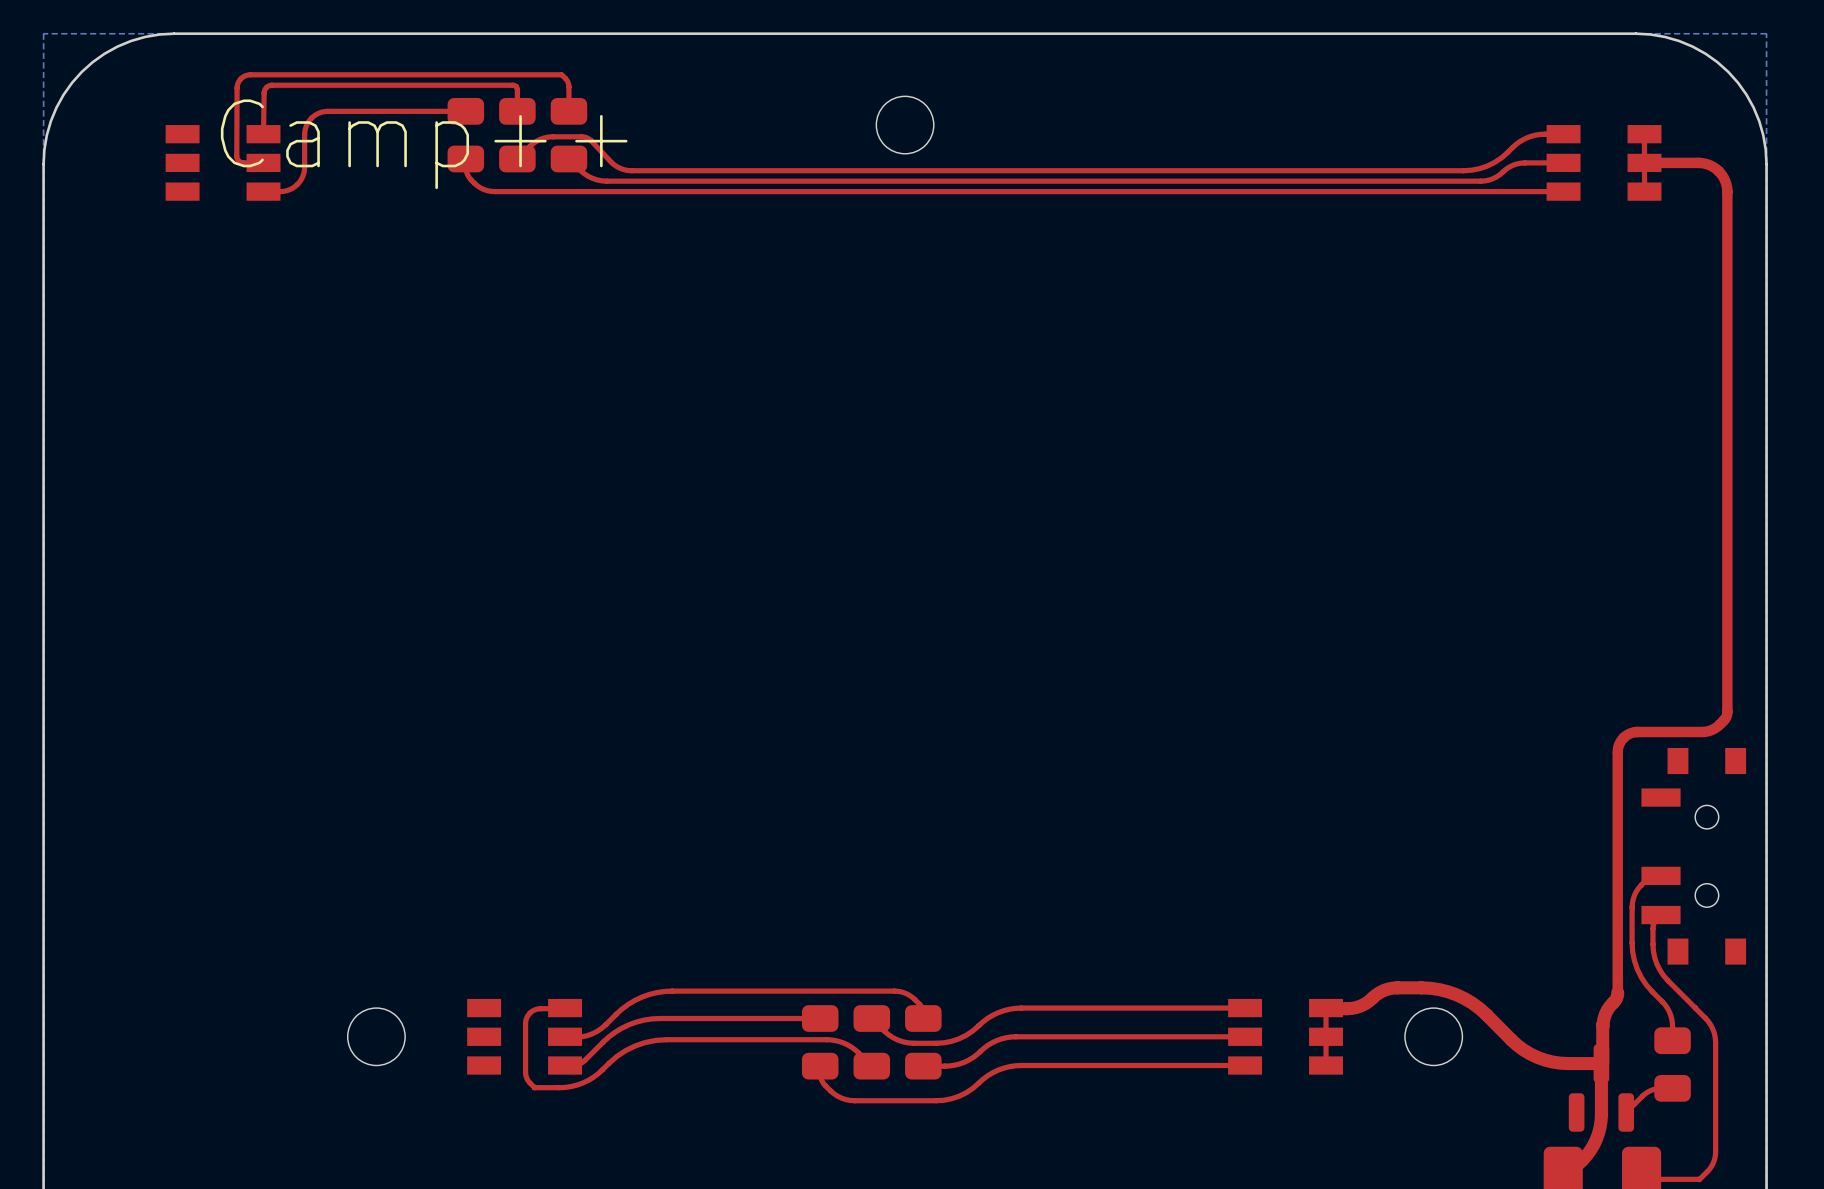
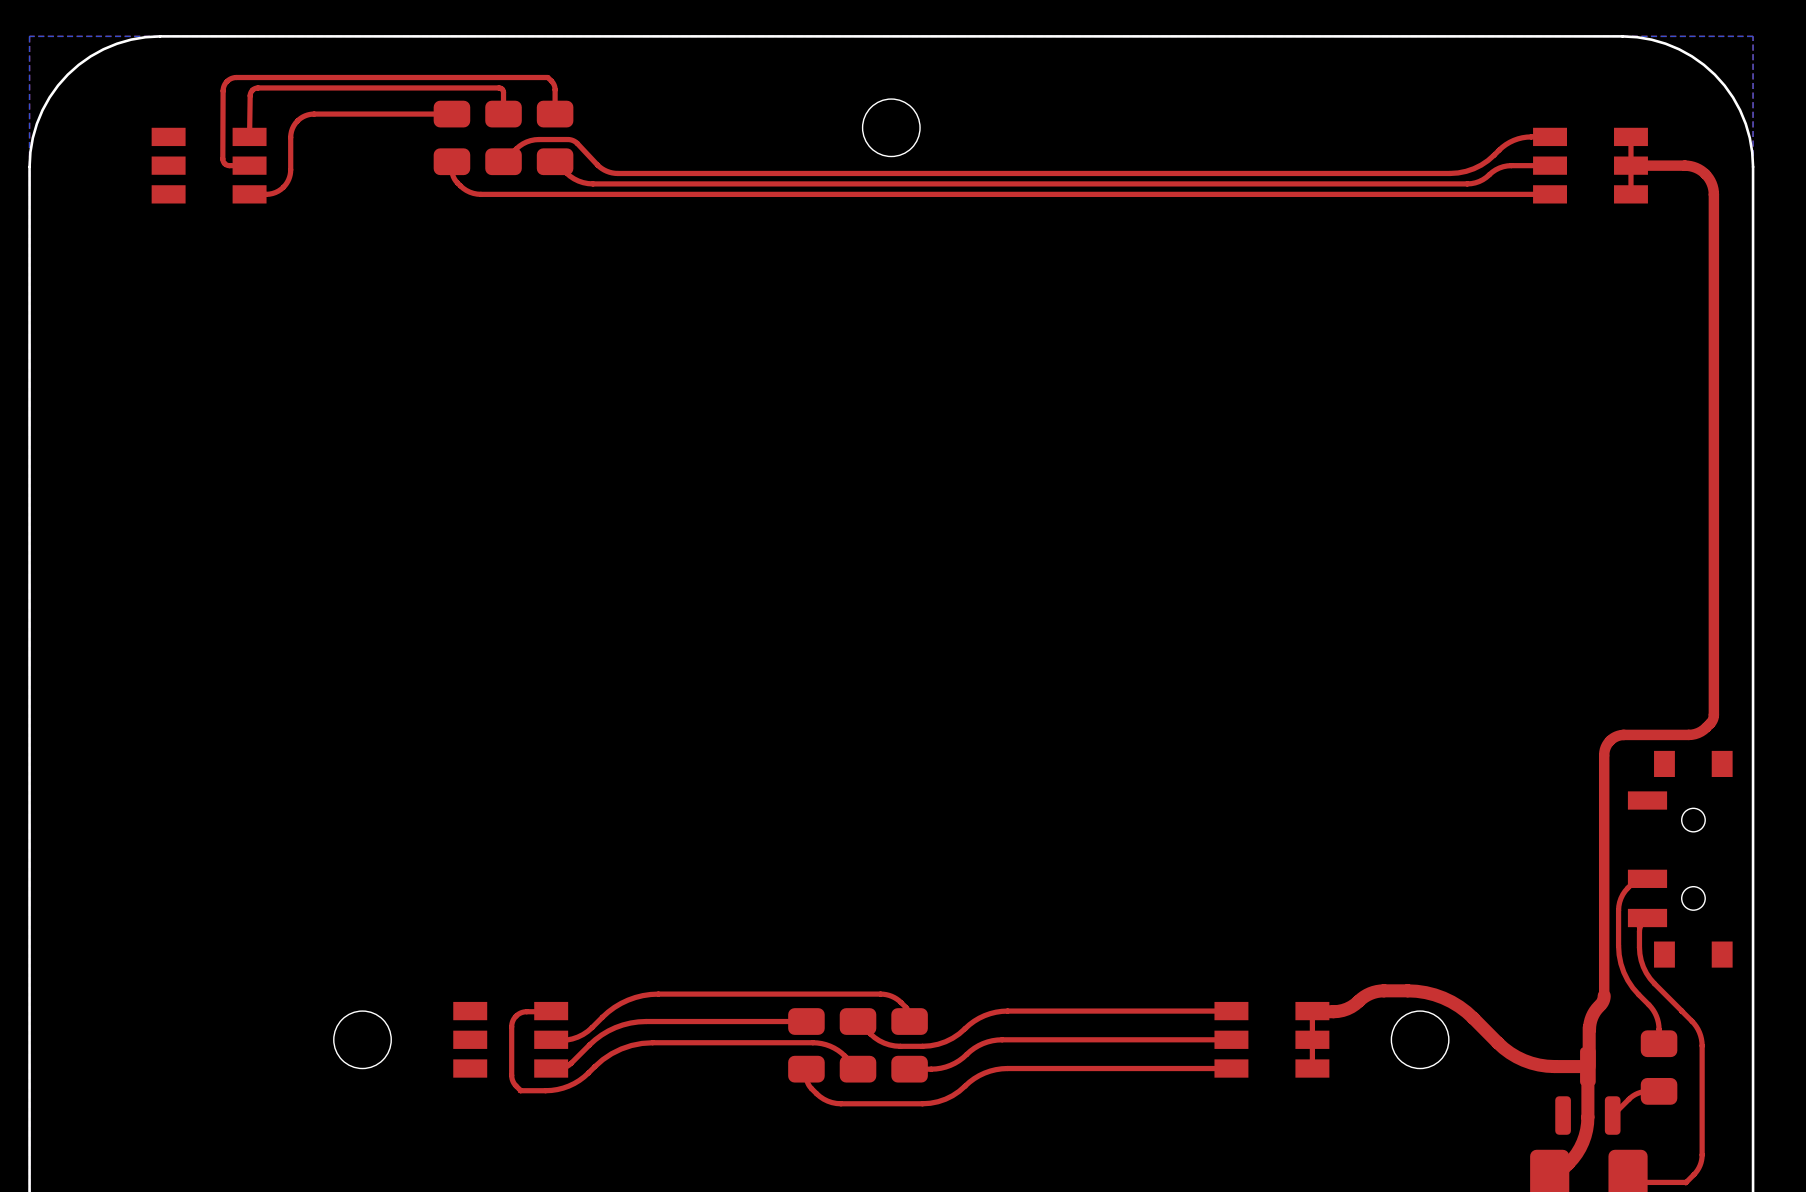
text: Camp++ (424, 144) -> none

